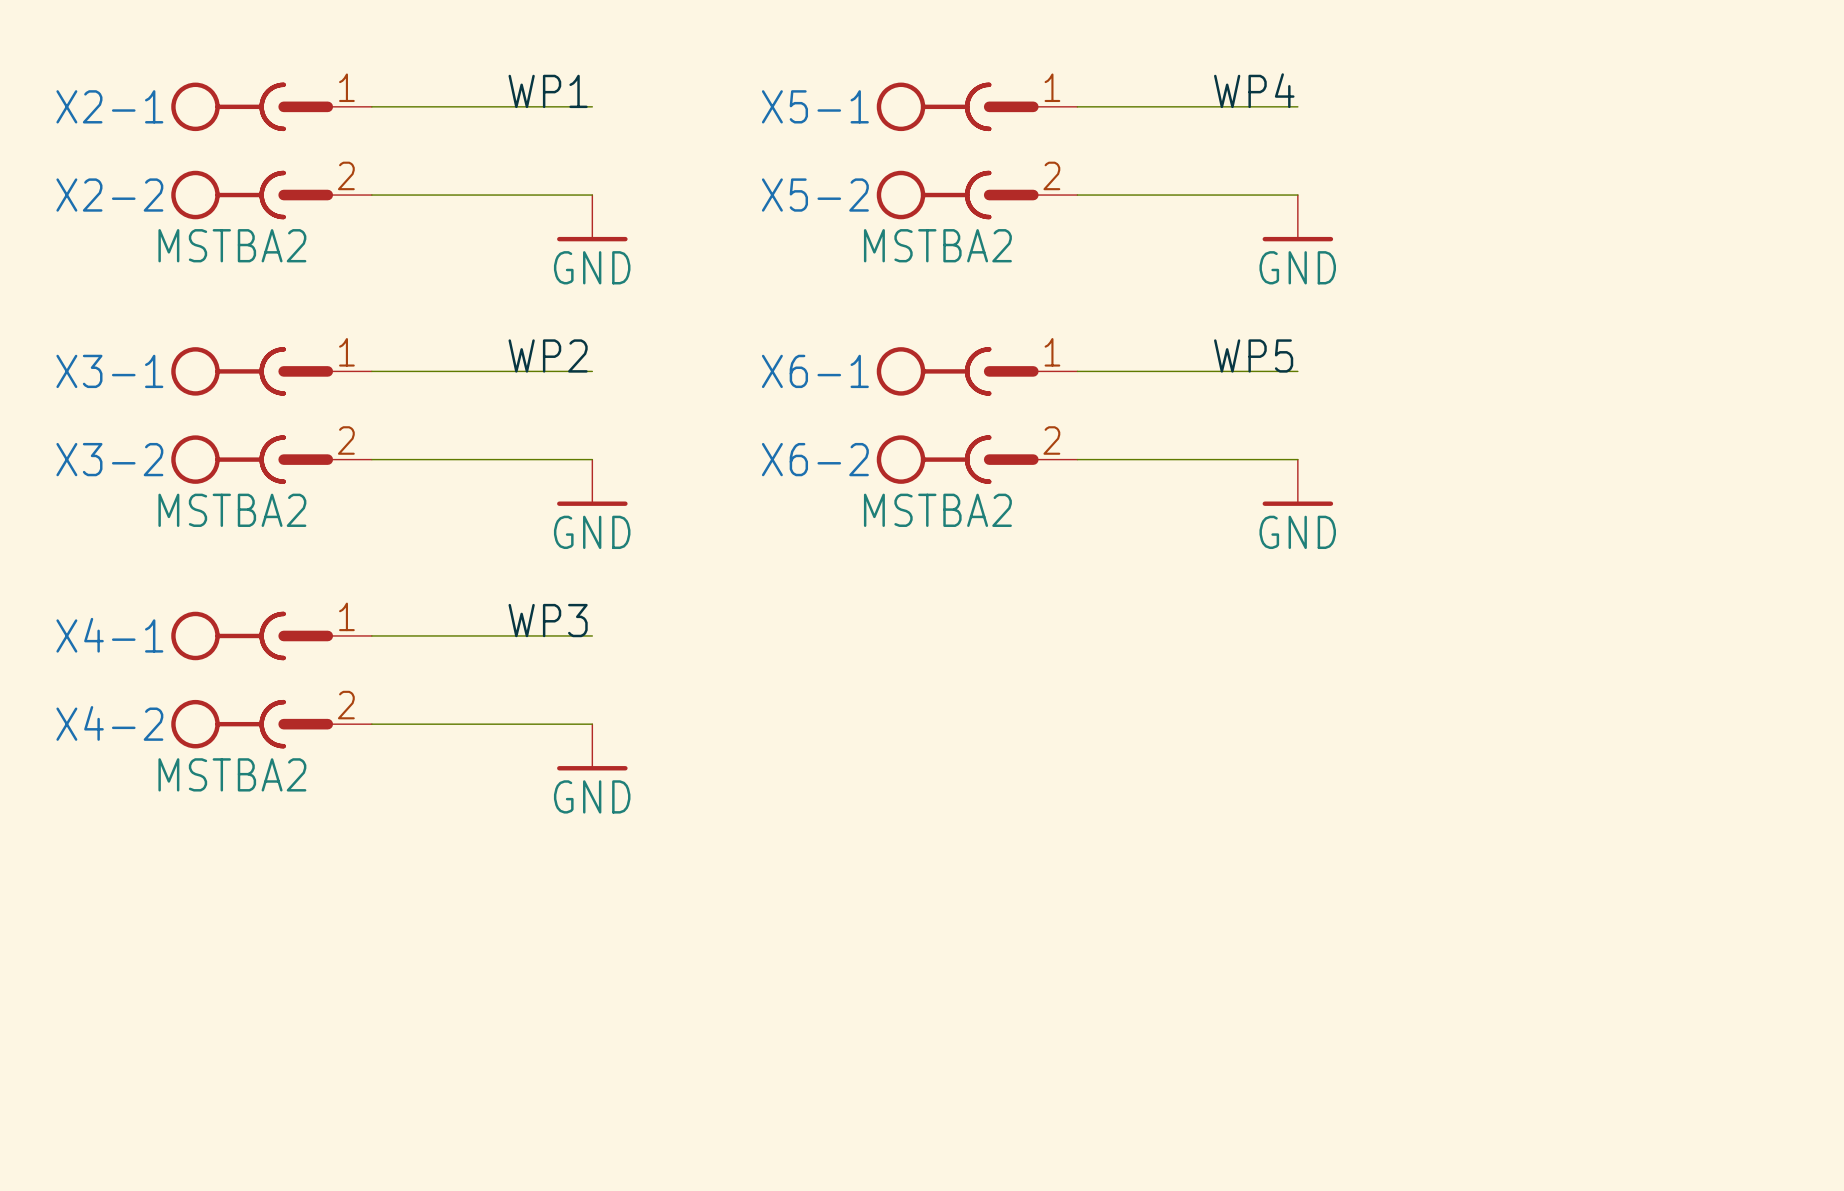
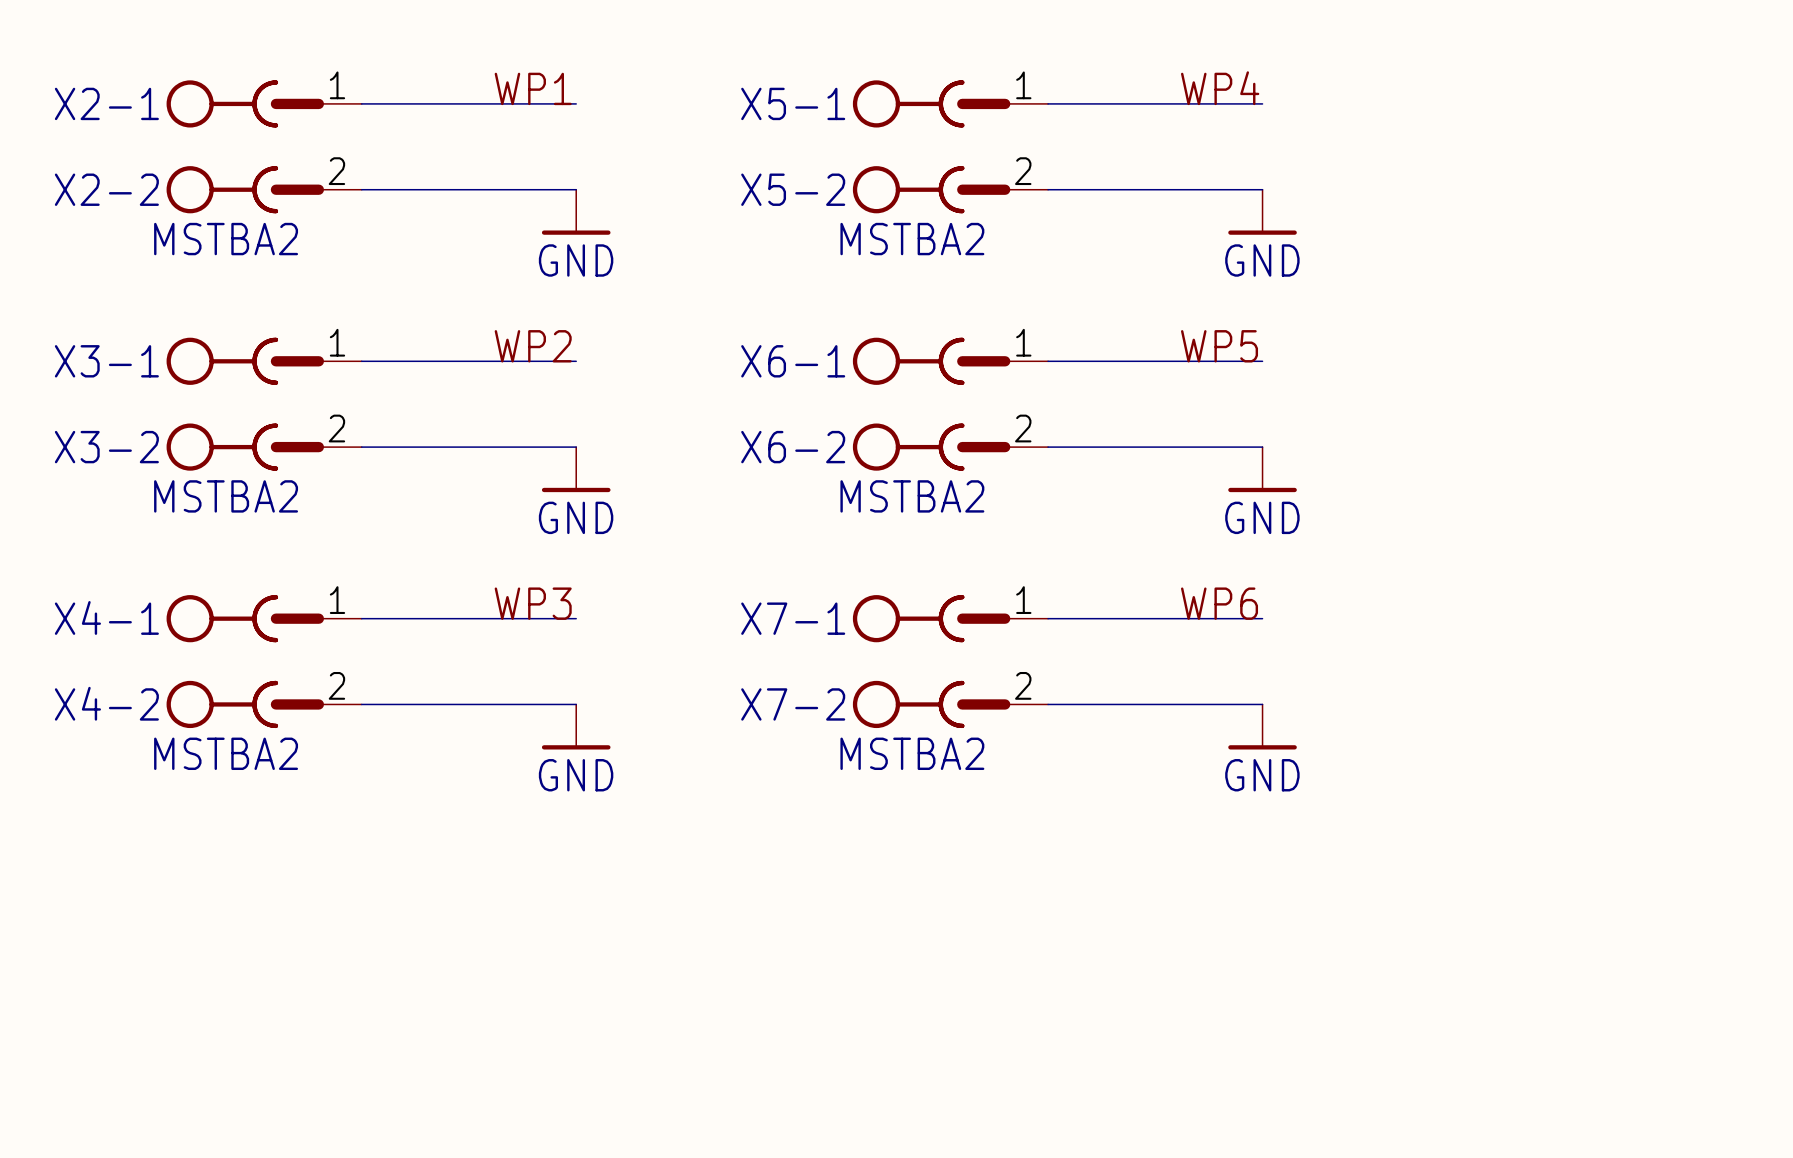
label: none -> WP6 (1219, 603)
X7-1: none -> (950, 618)
wire: none -> (1048, 618) (1262, 618)
X7-2: none -> MSTBA2 (950, 704)
wire: none -> (1048, 704) (1262, 704)
power symbol: none -> GND (1262, 726)

